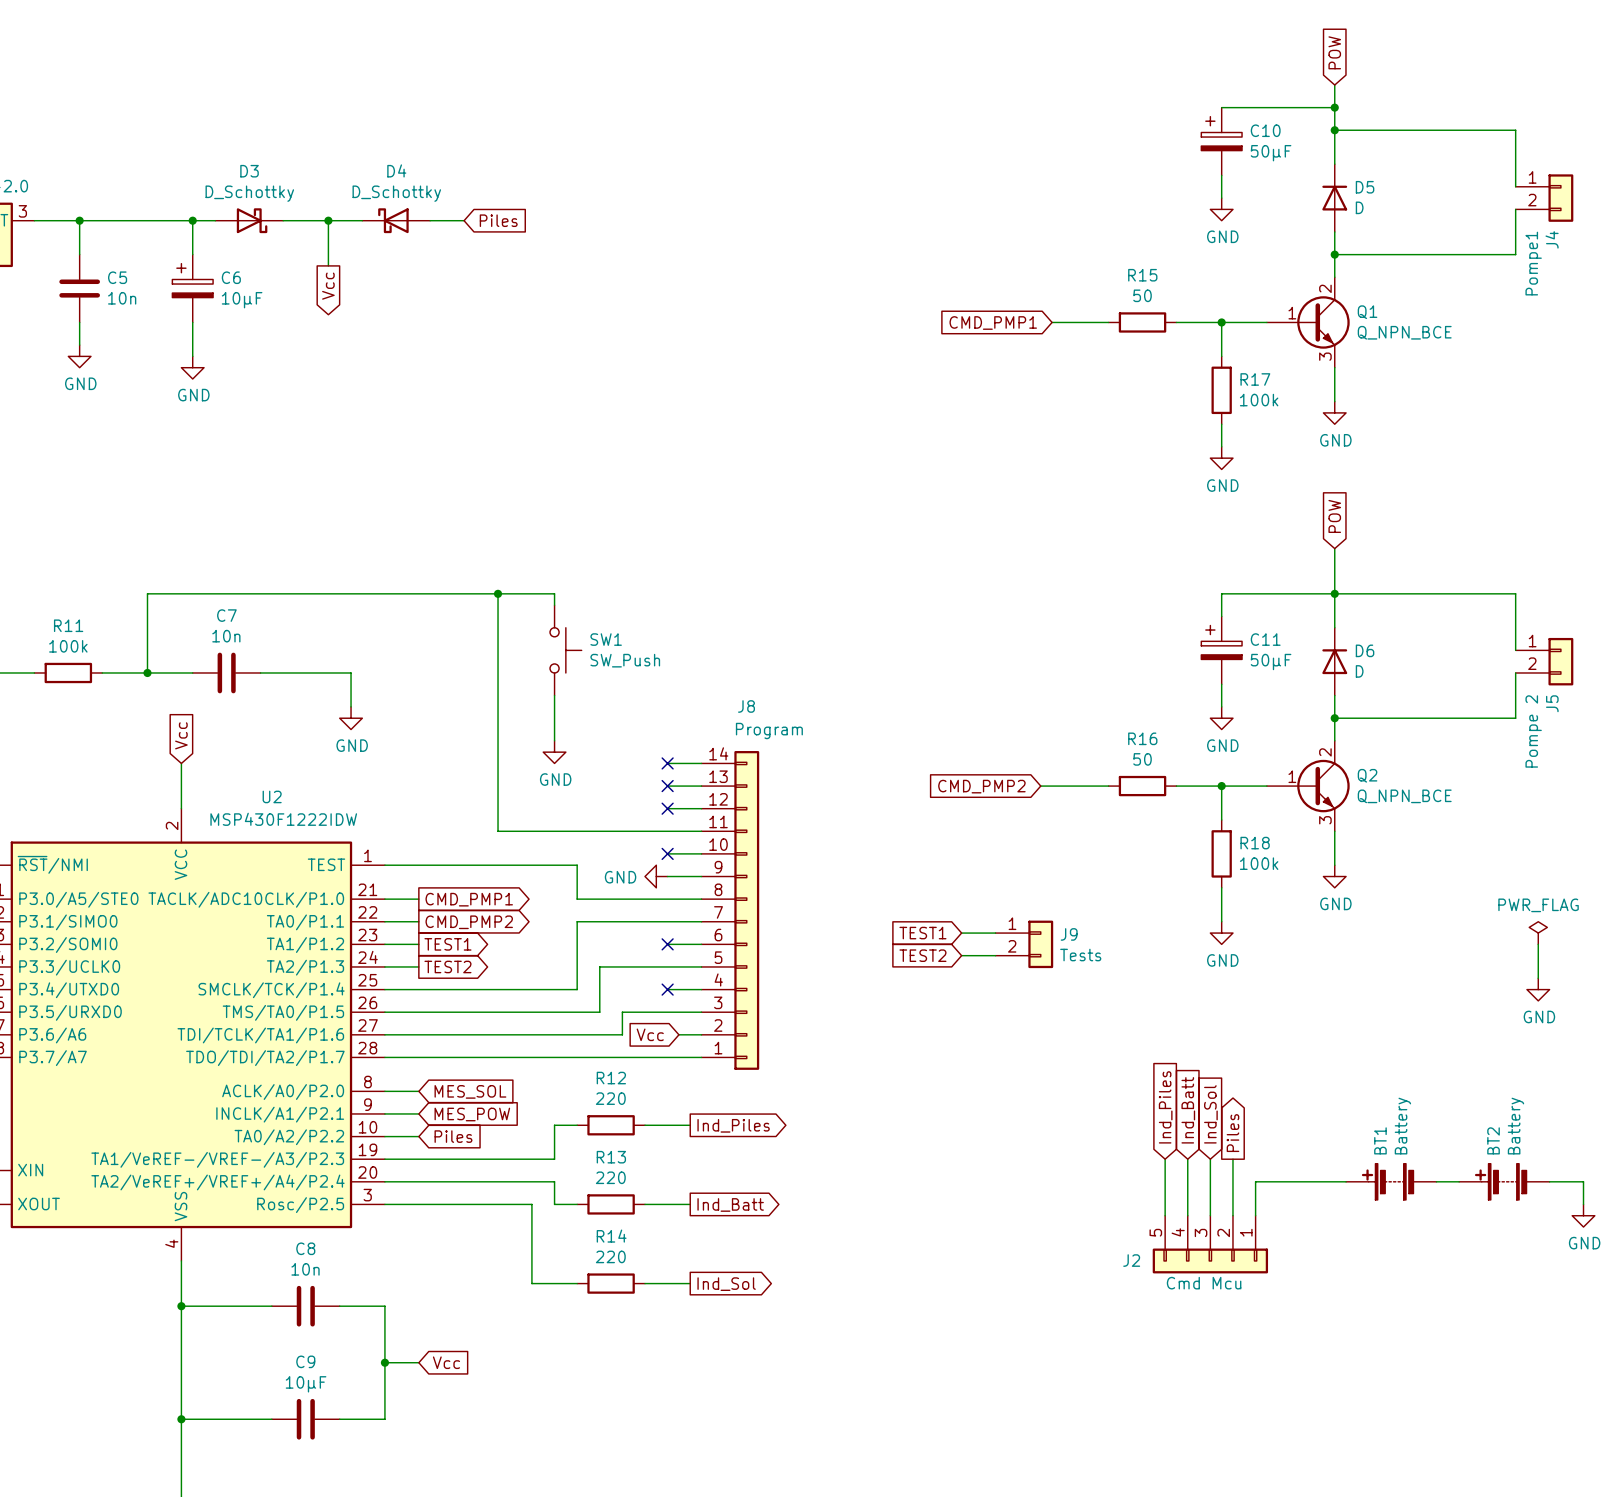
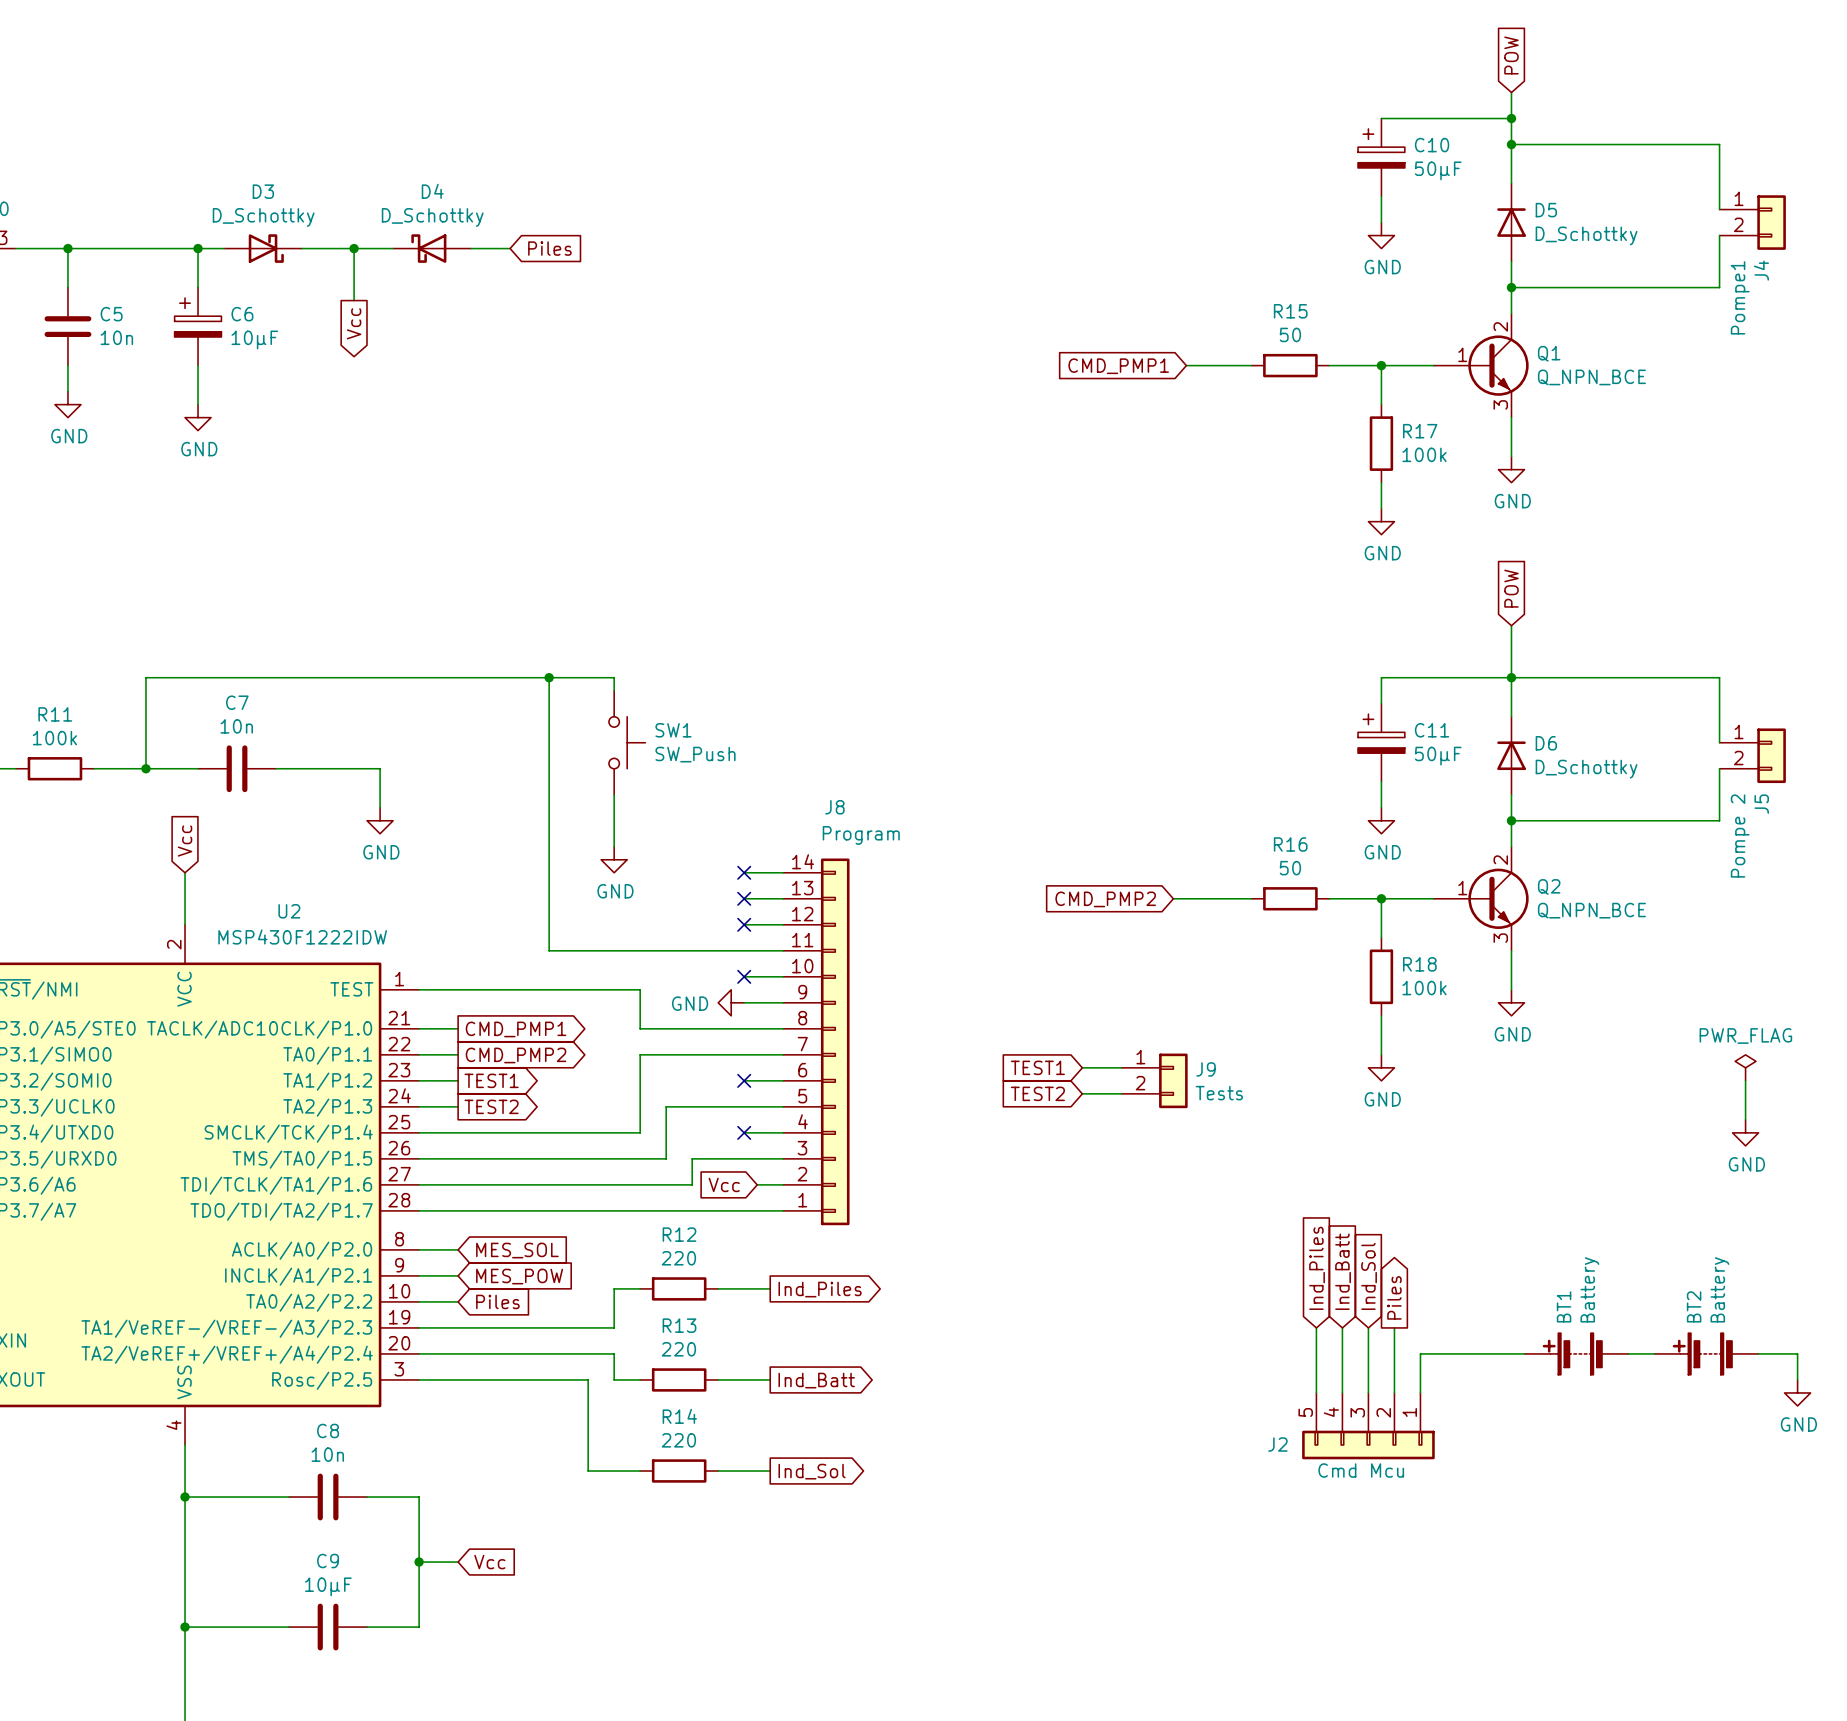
D5 value: D (1359, 207) -> D_Schottky (1586, 235)
D6 value: D (1359, 671) -> D_Schottky (1586, 769)

